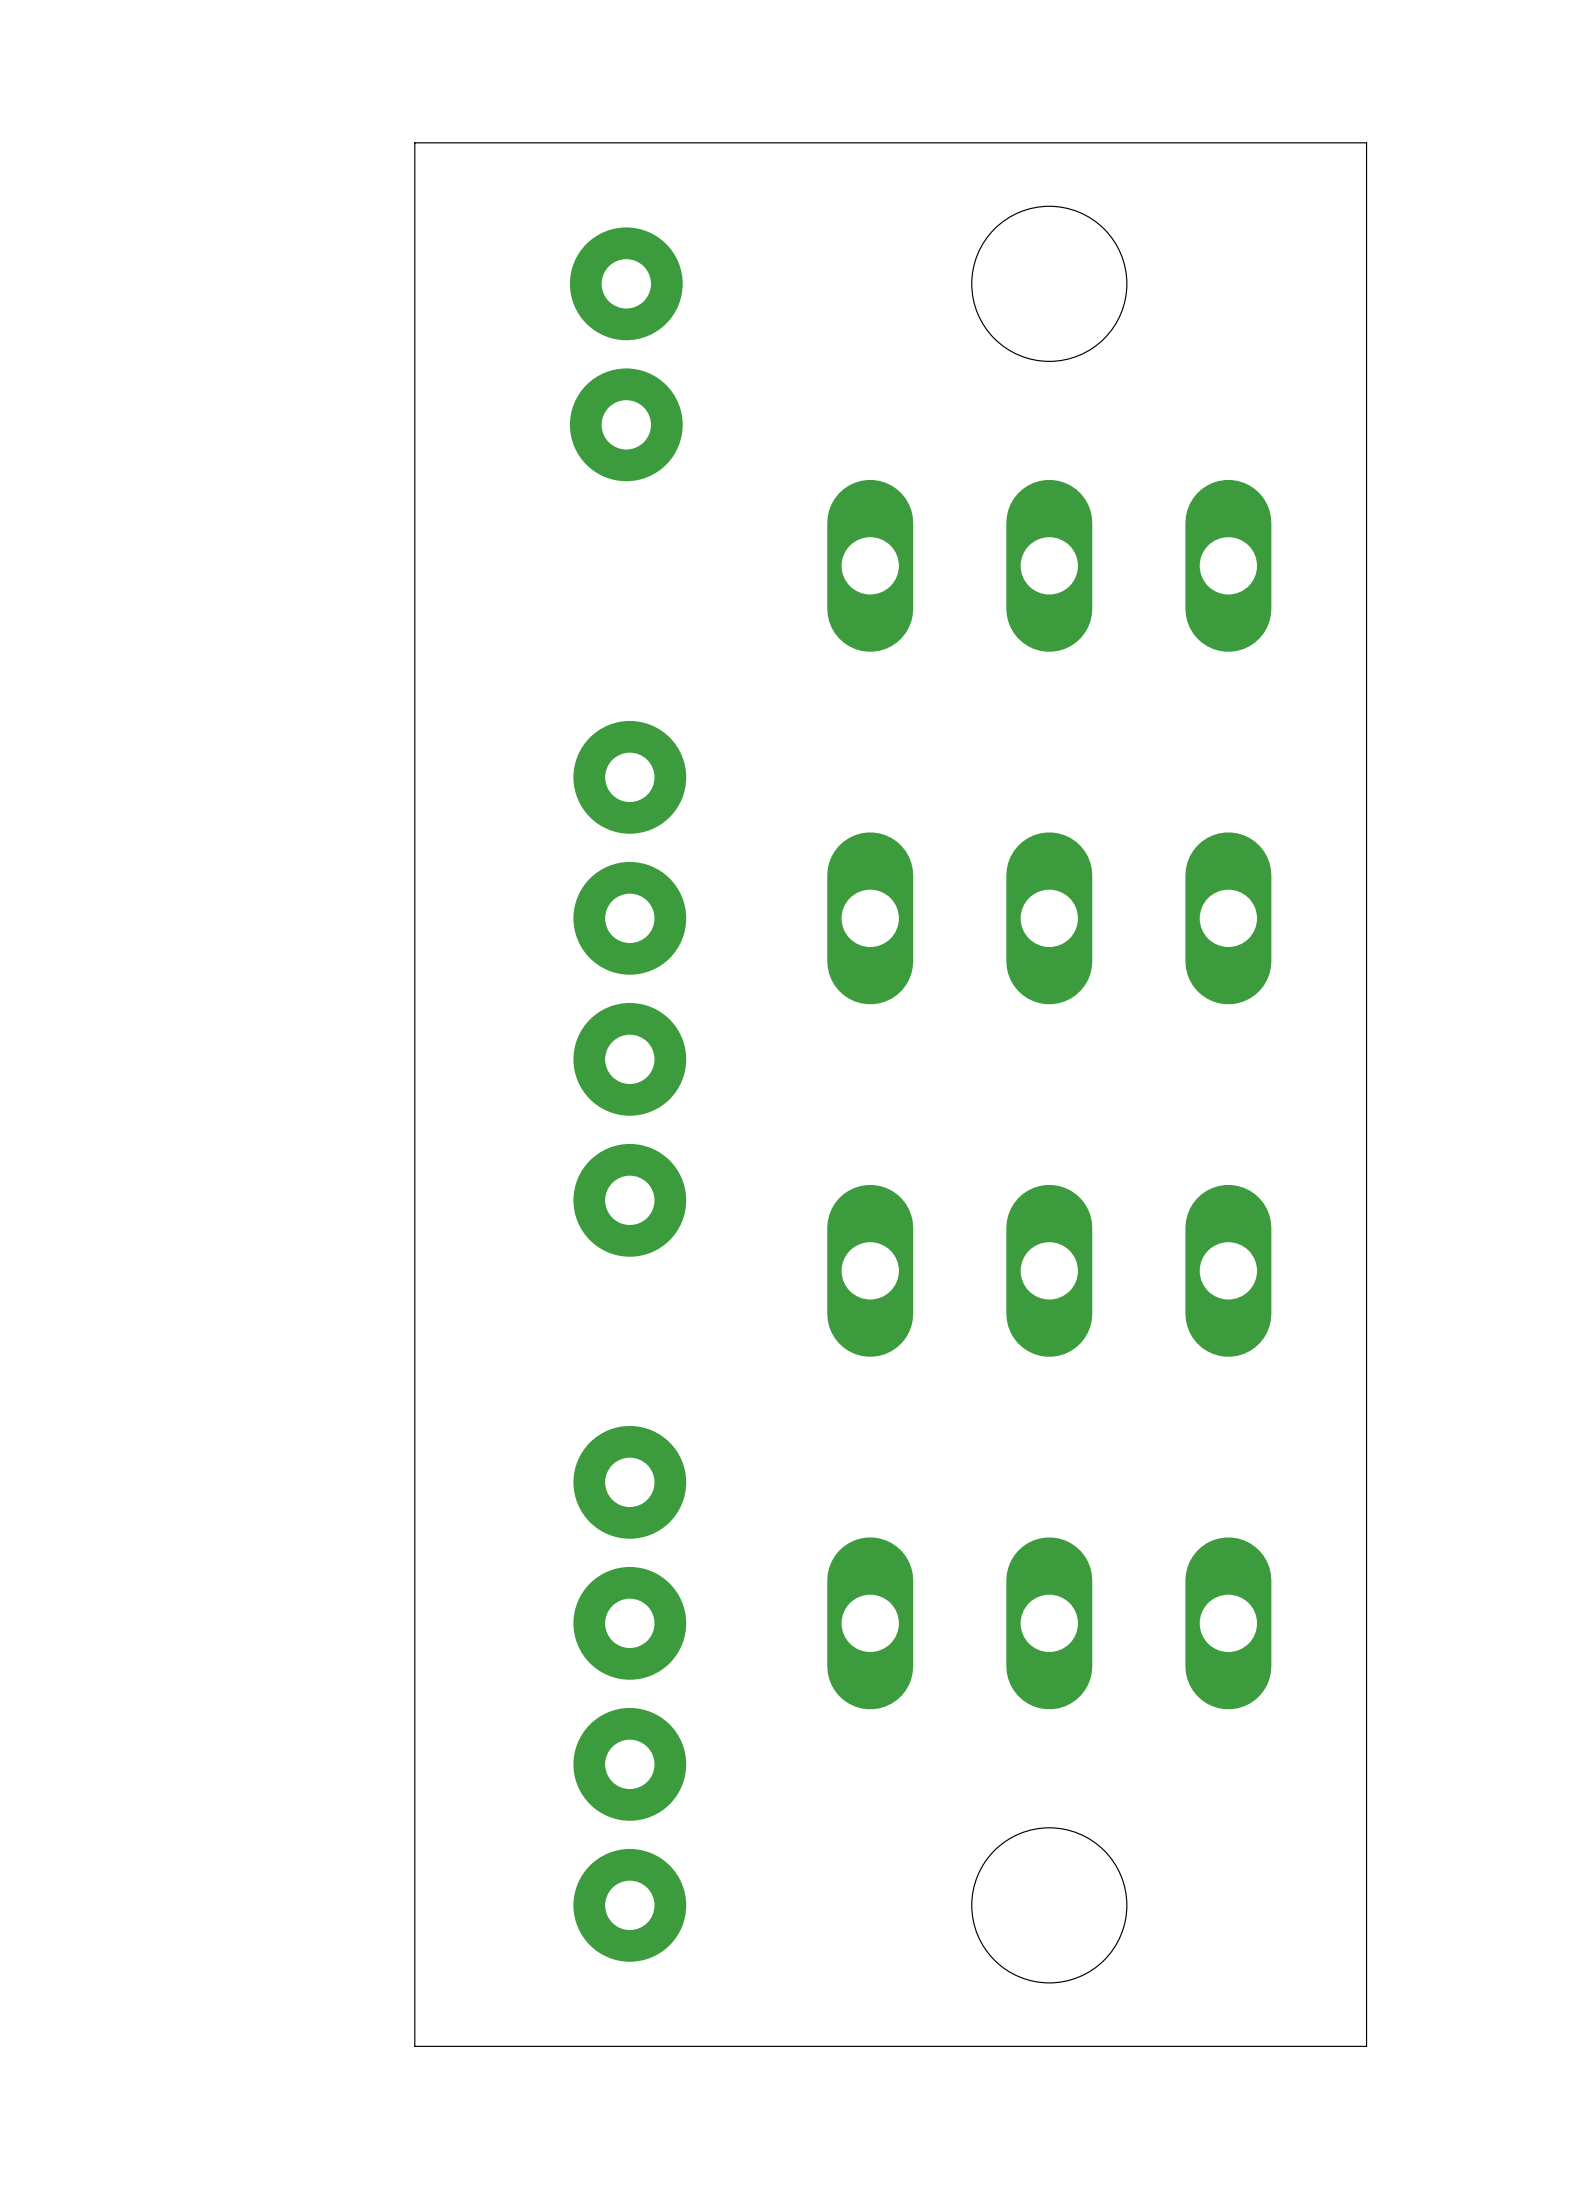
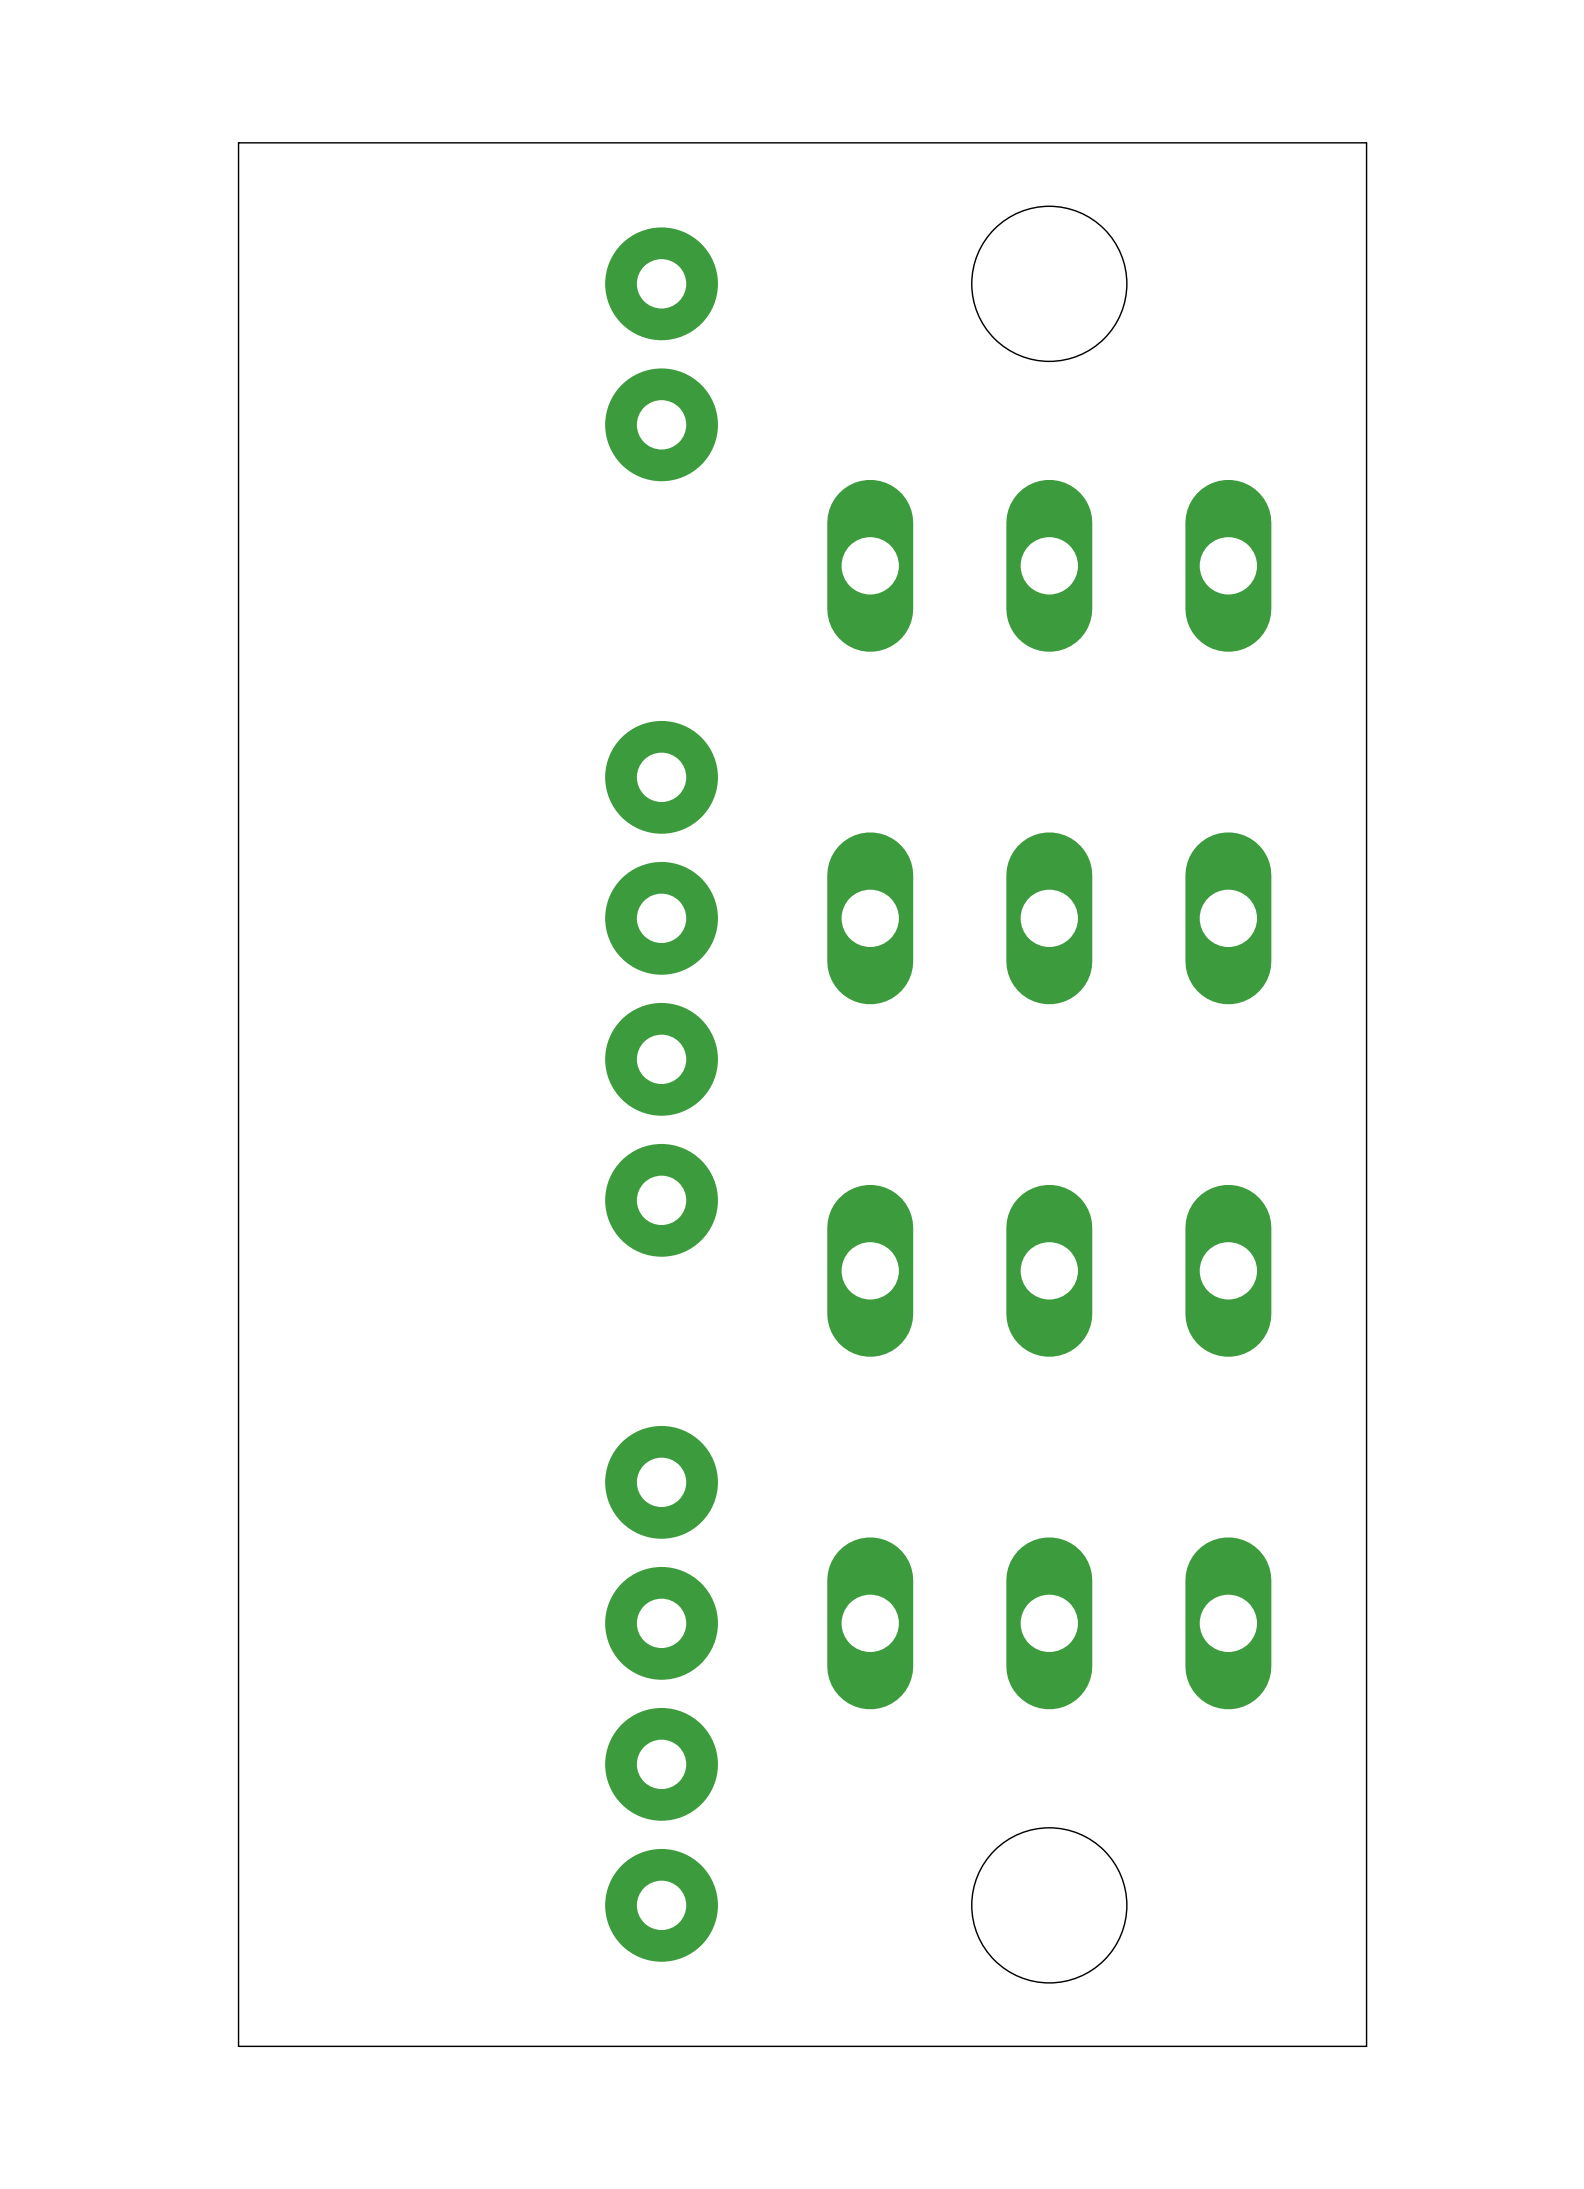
board edge: (414, 142) (414, 2046) -> (414, 142) (238, 142) (238, 2046) (414, 2046)
part position: (626, 354) -> (661, 354)
part position: (629, 988) -> (661, 988)
part position: (629, 1693) -> (661, 1693)

